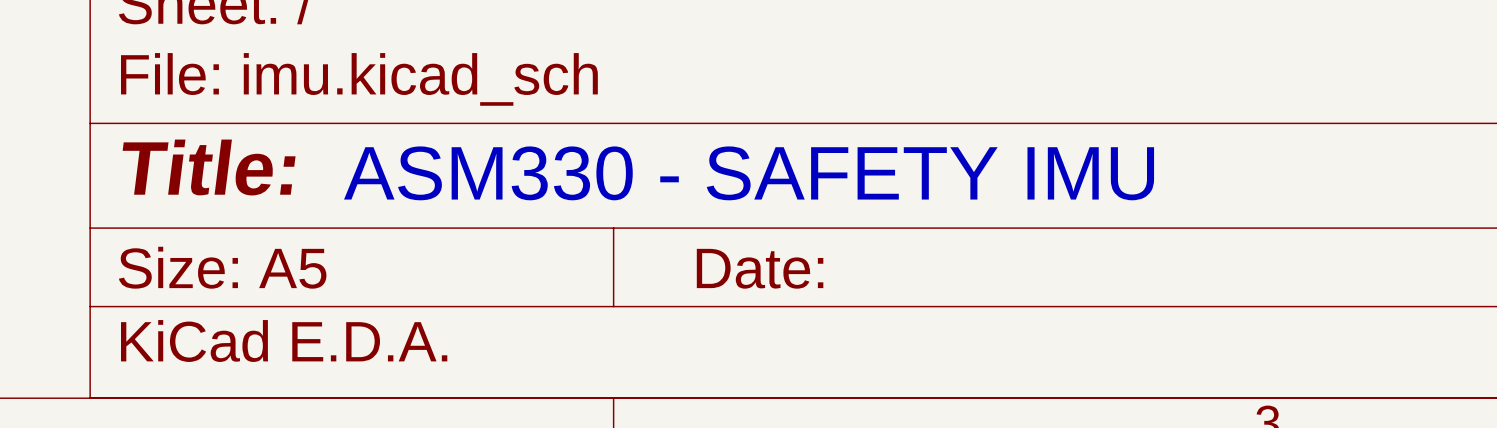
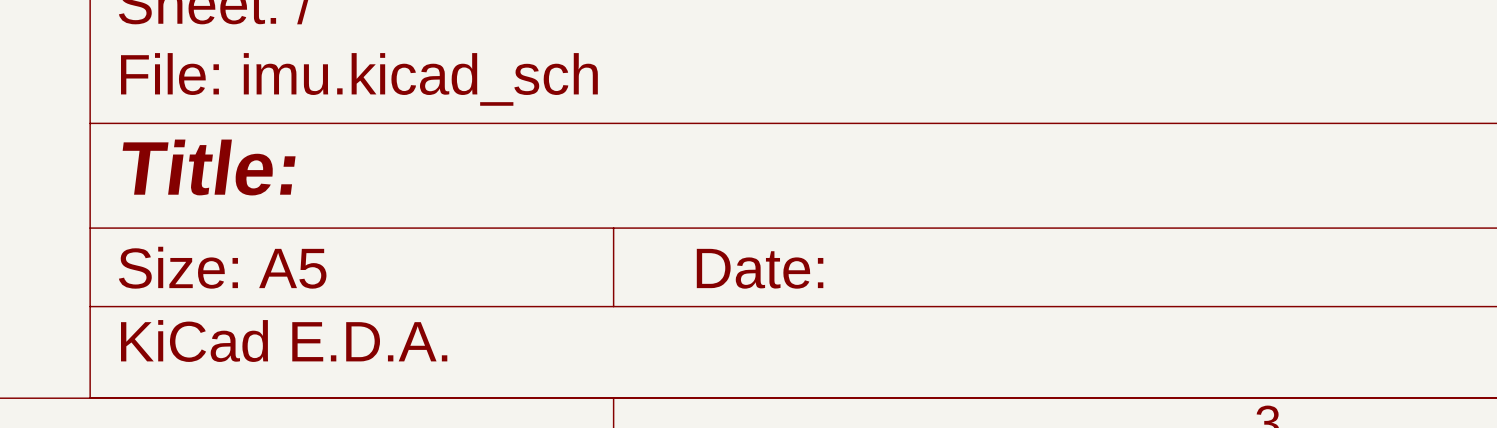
text: ASM330 - SAFETY IMU (749, 173) -> none

